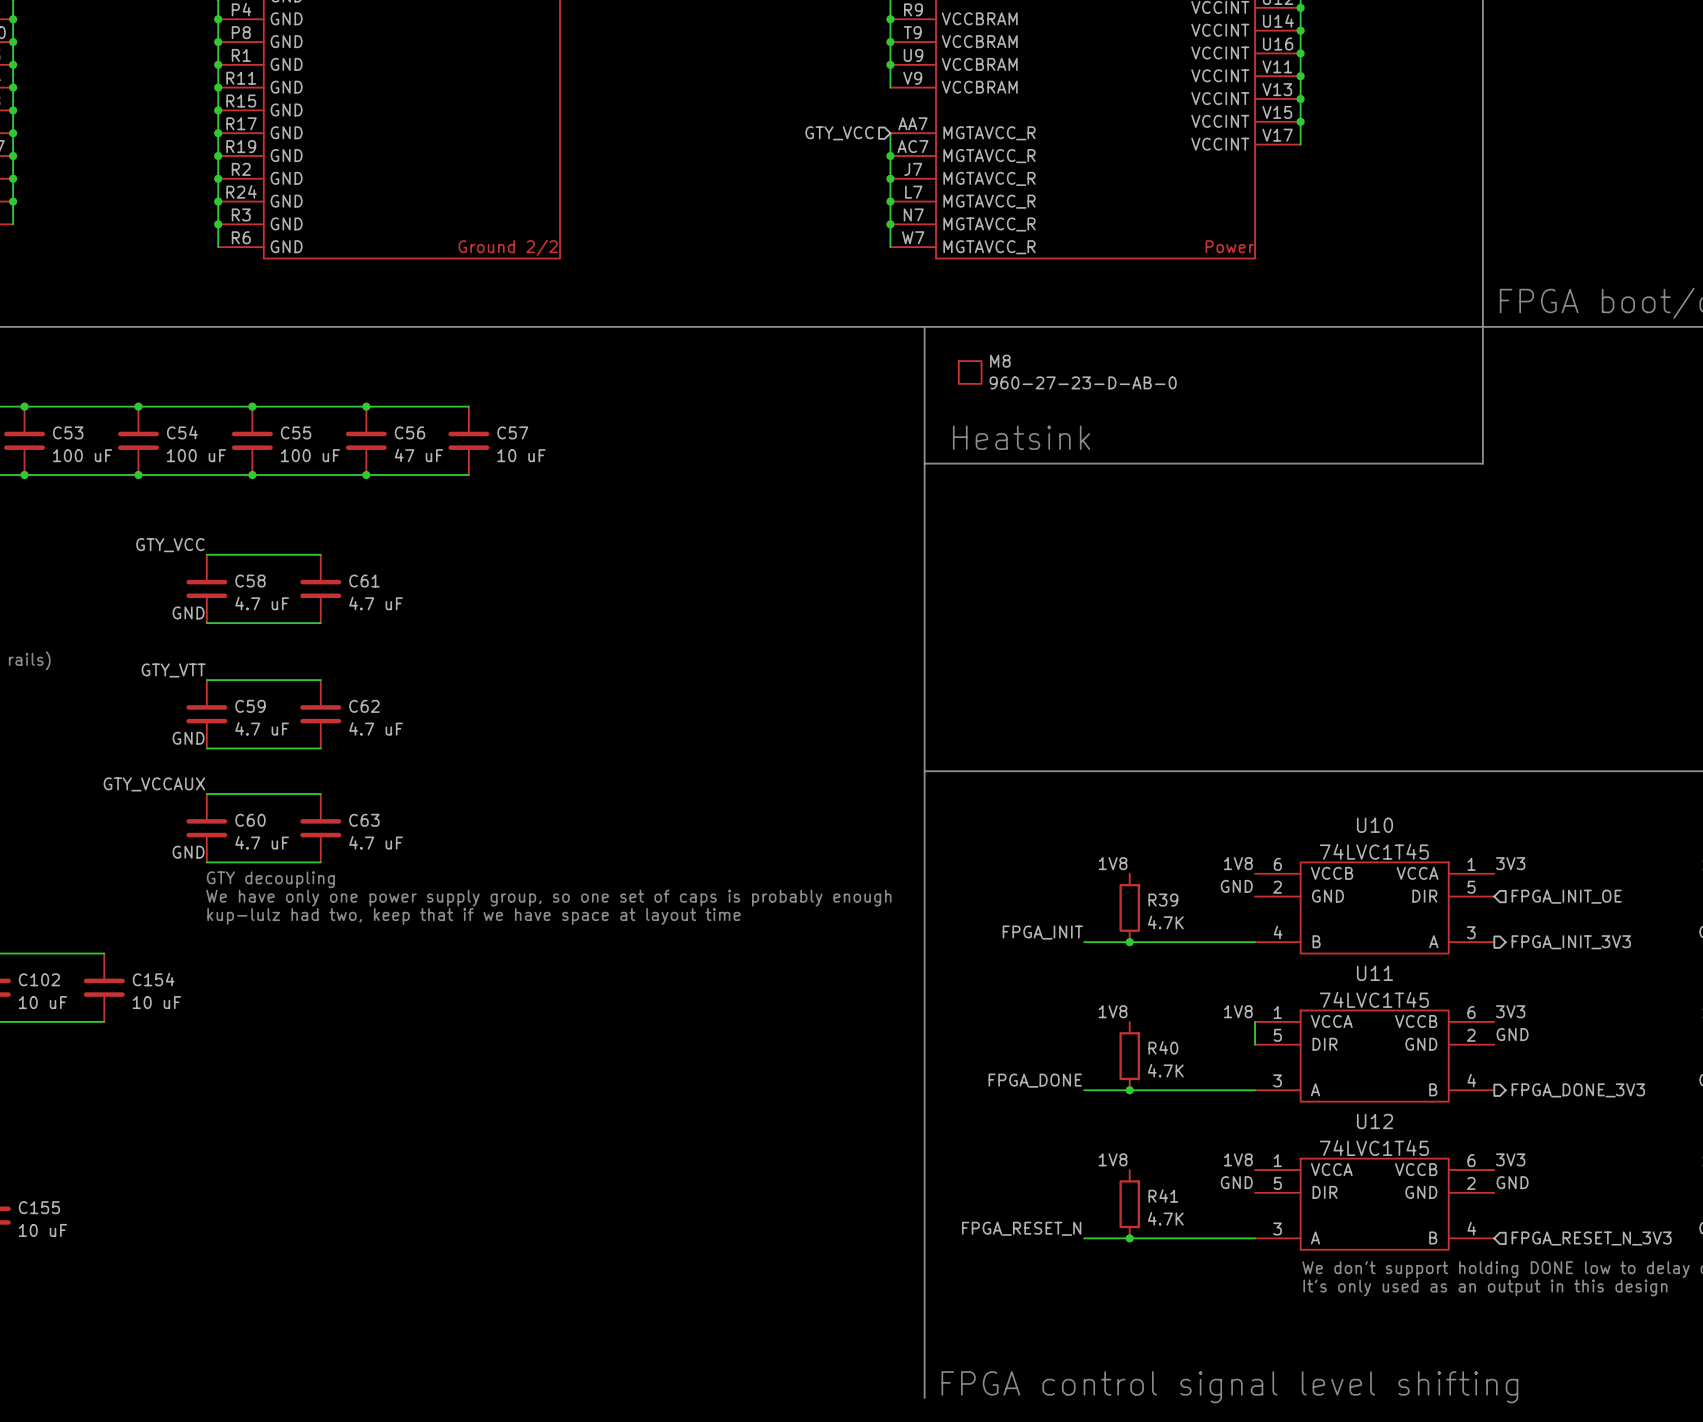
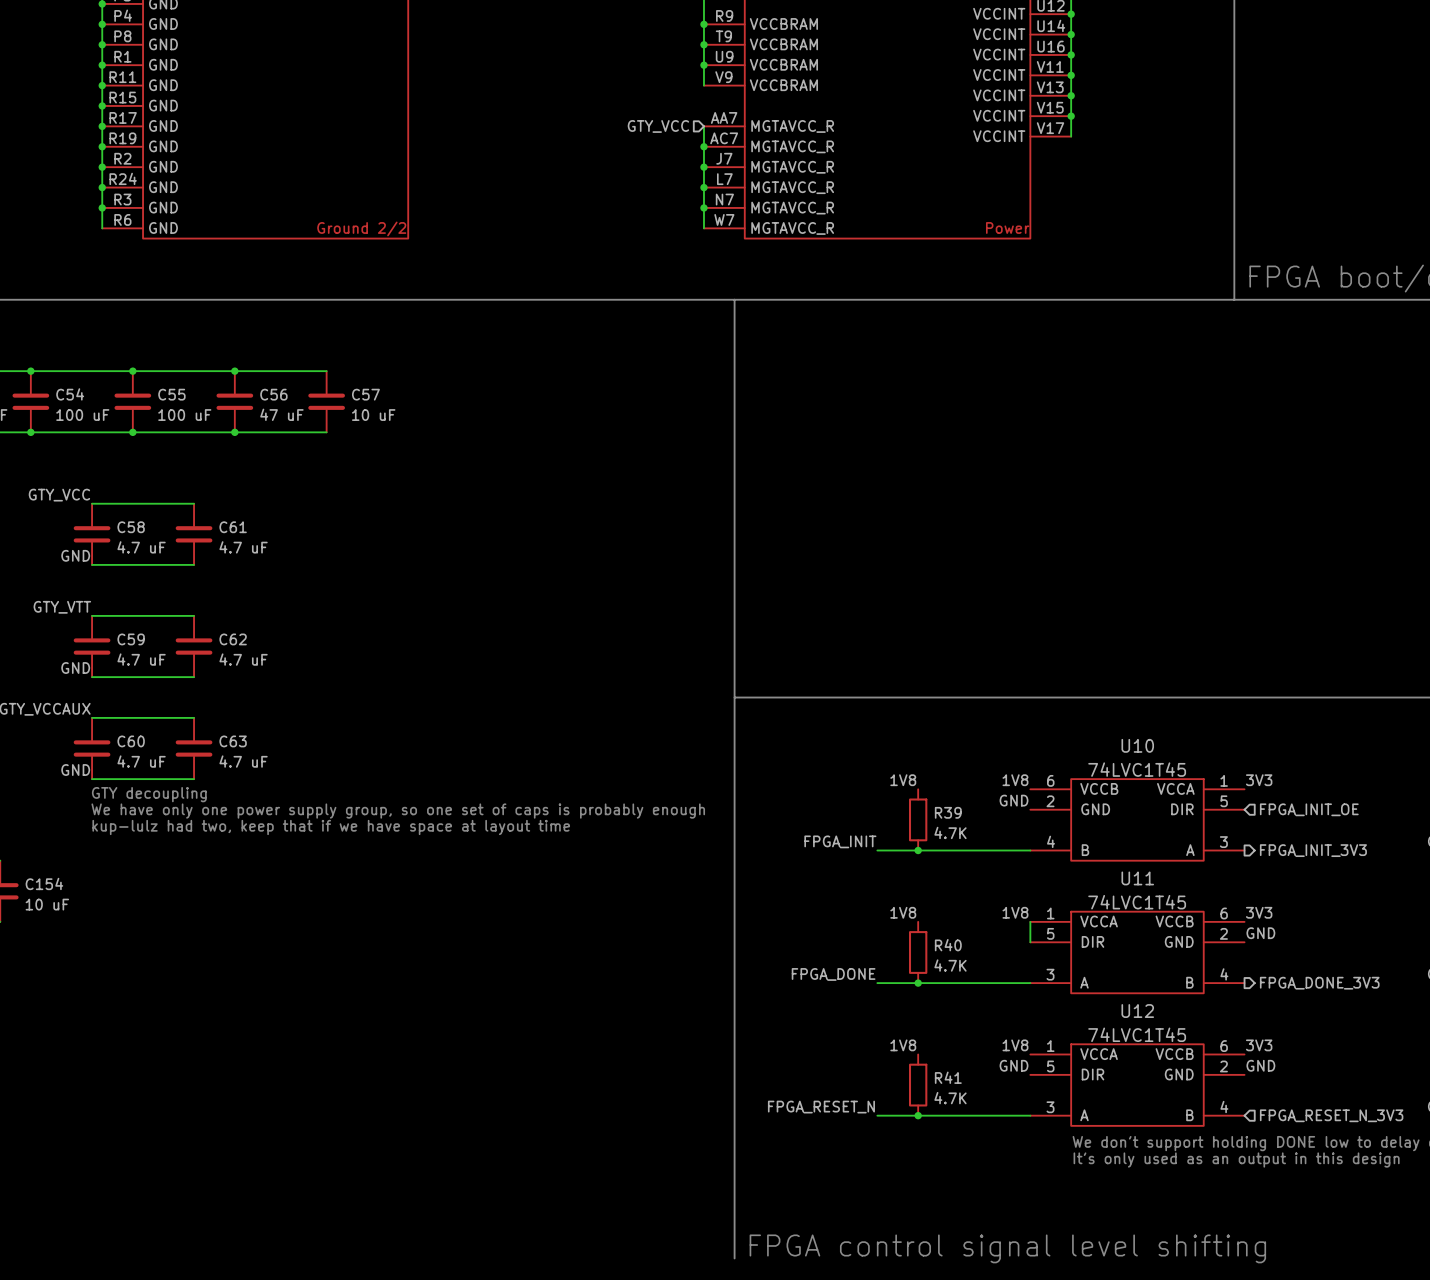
line: (1482, 326) (1482, 463) (924, 463) -> none
M8: 960-27-23-D-AB-0 (970, 372) -> none
text: Heatsink (1021, 437) -> none

